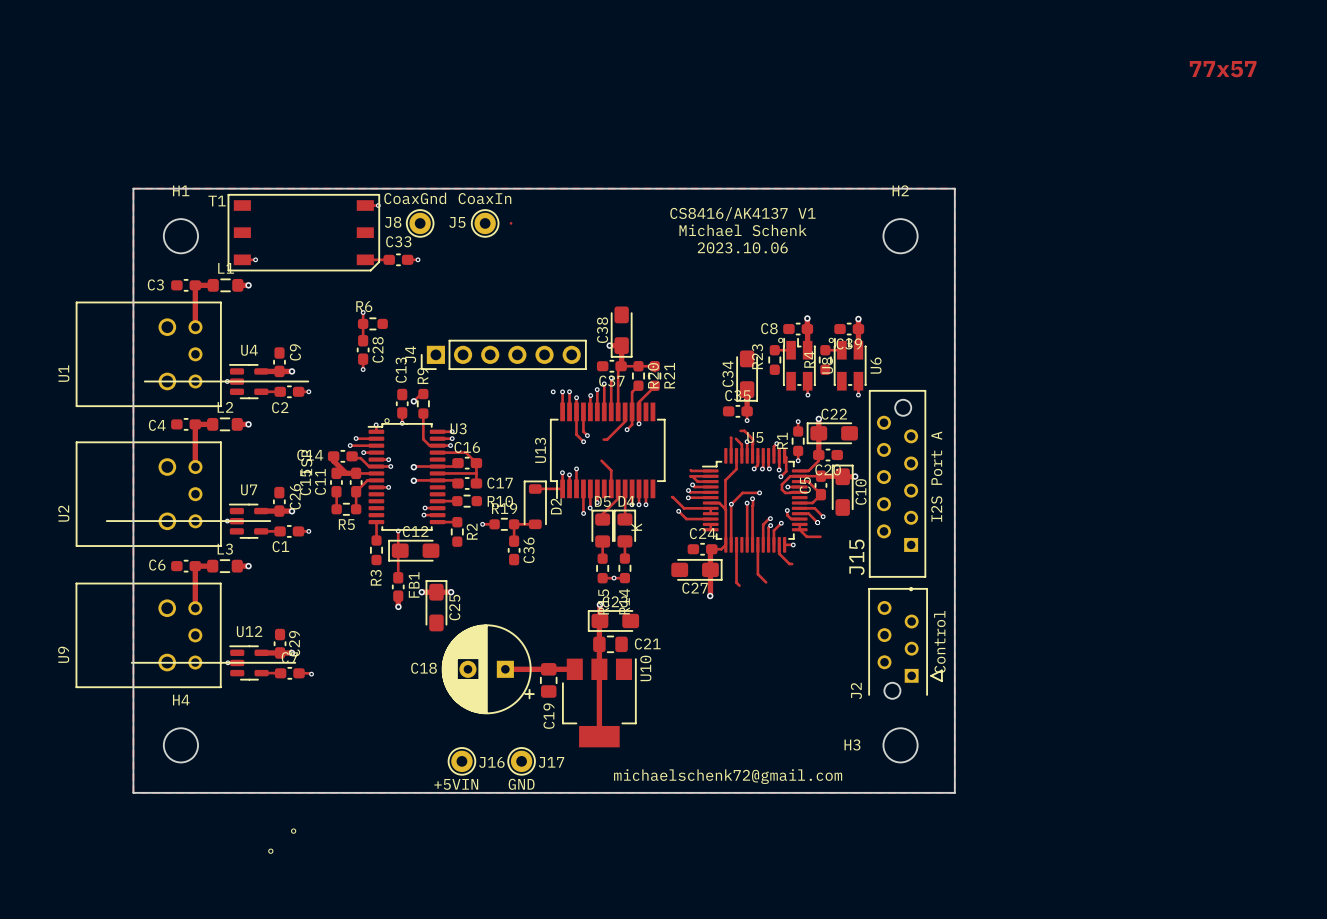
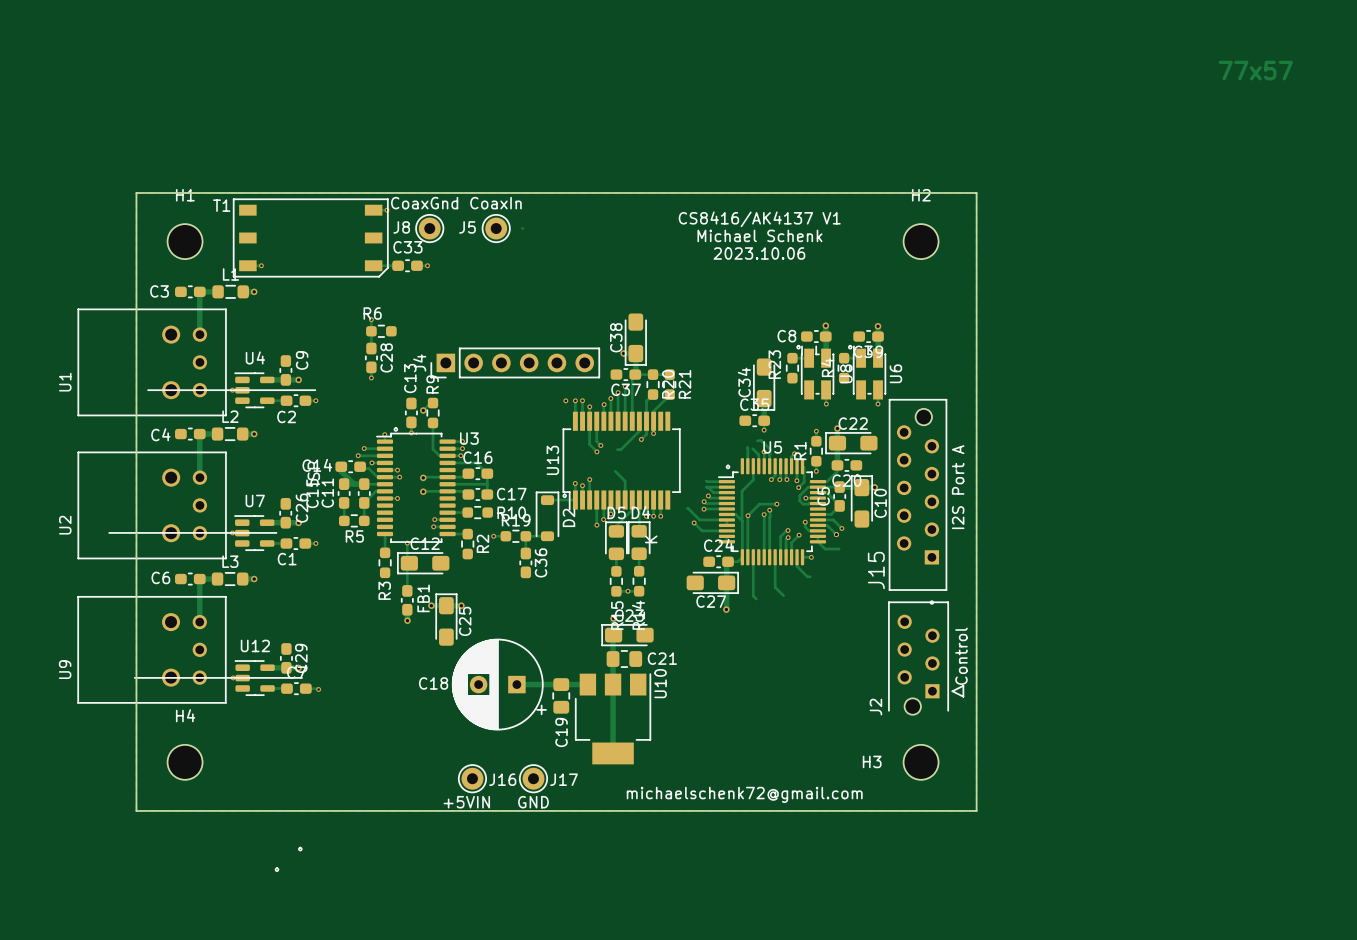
text: none -> ° (728, 466)
text: none -> ° (564, 495)

